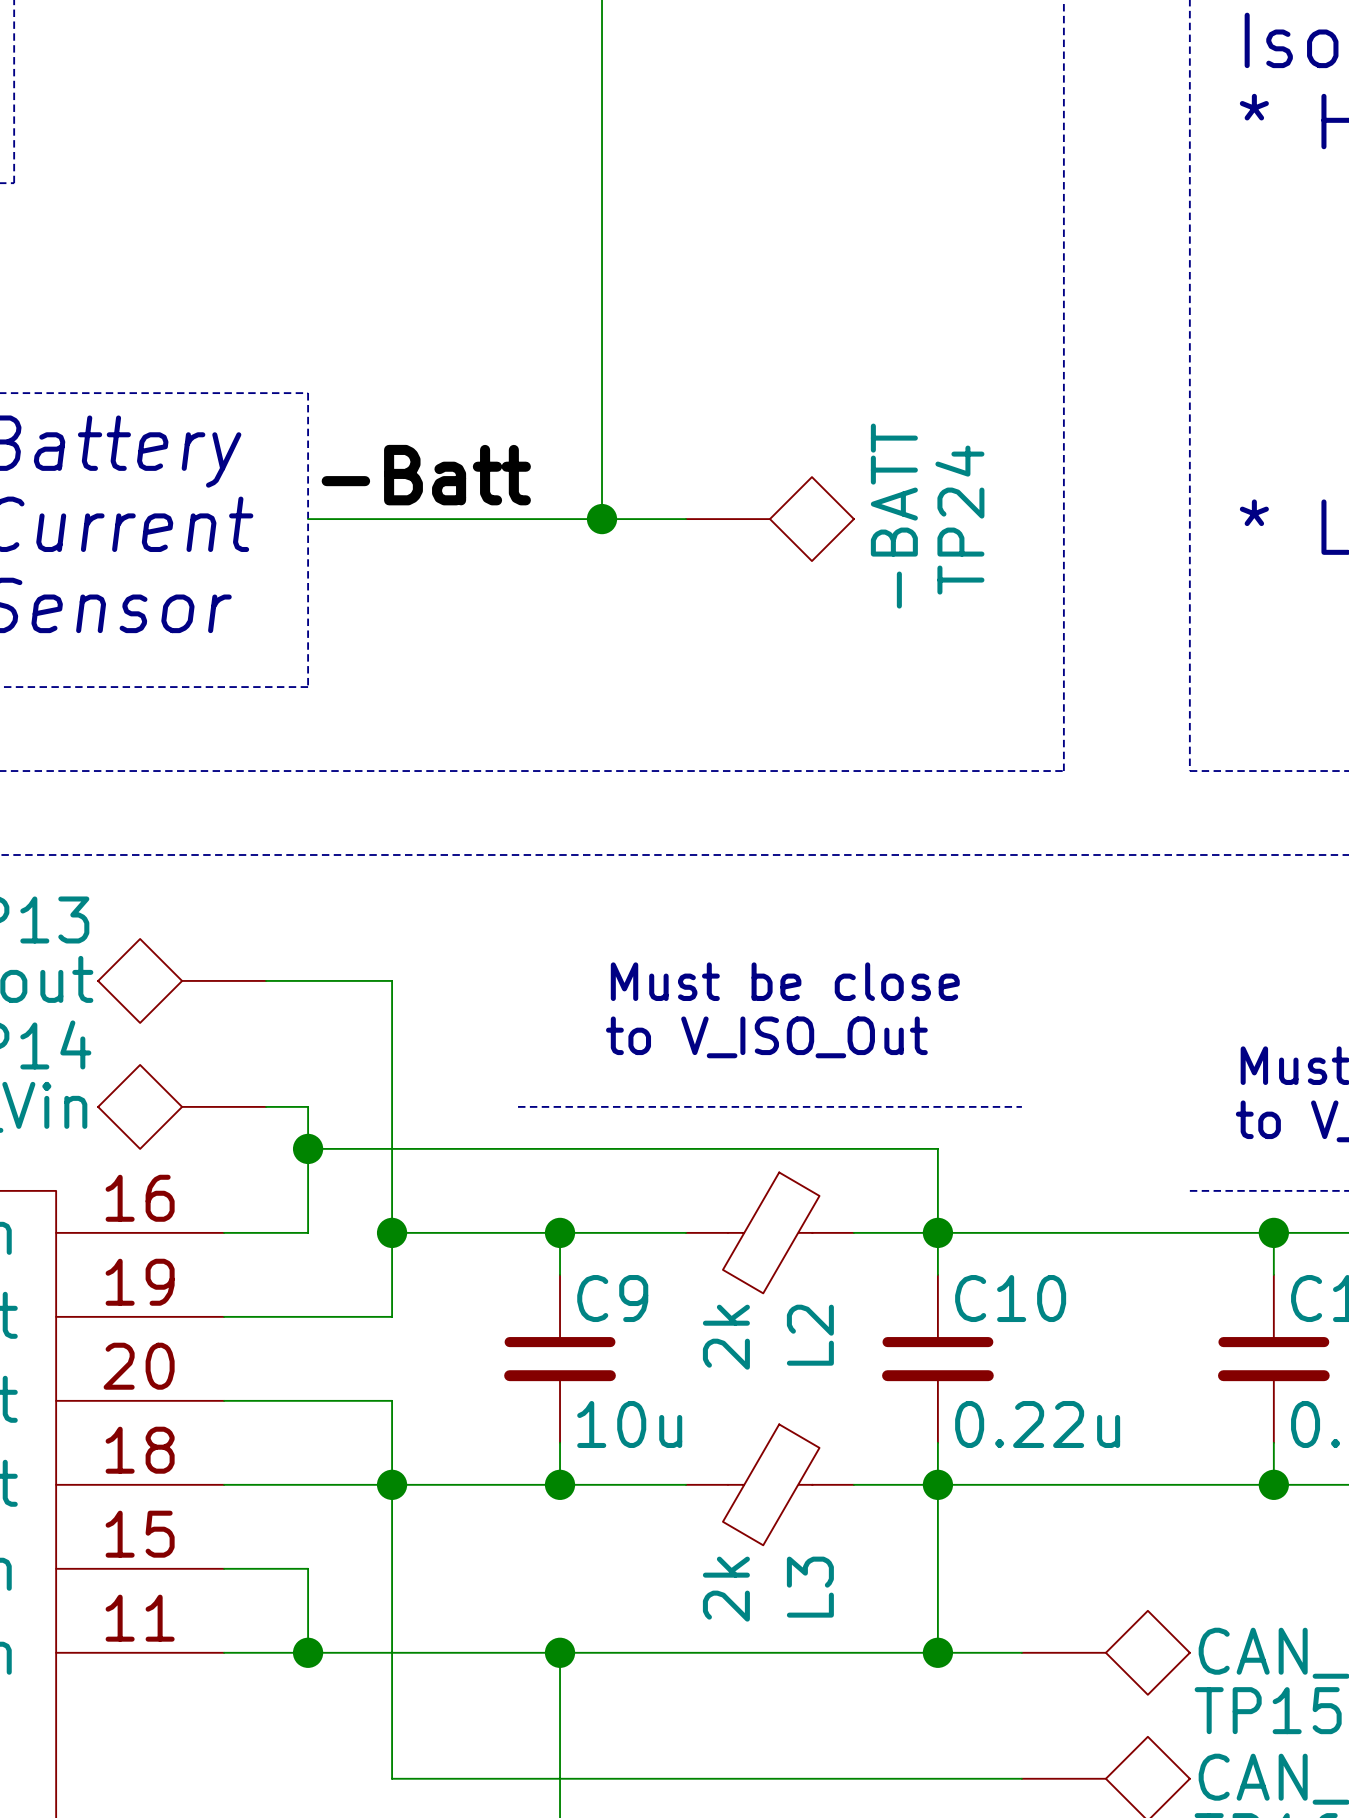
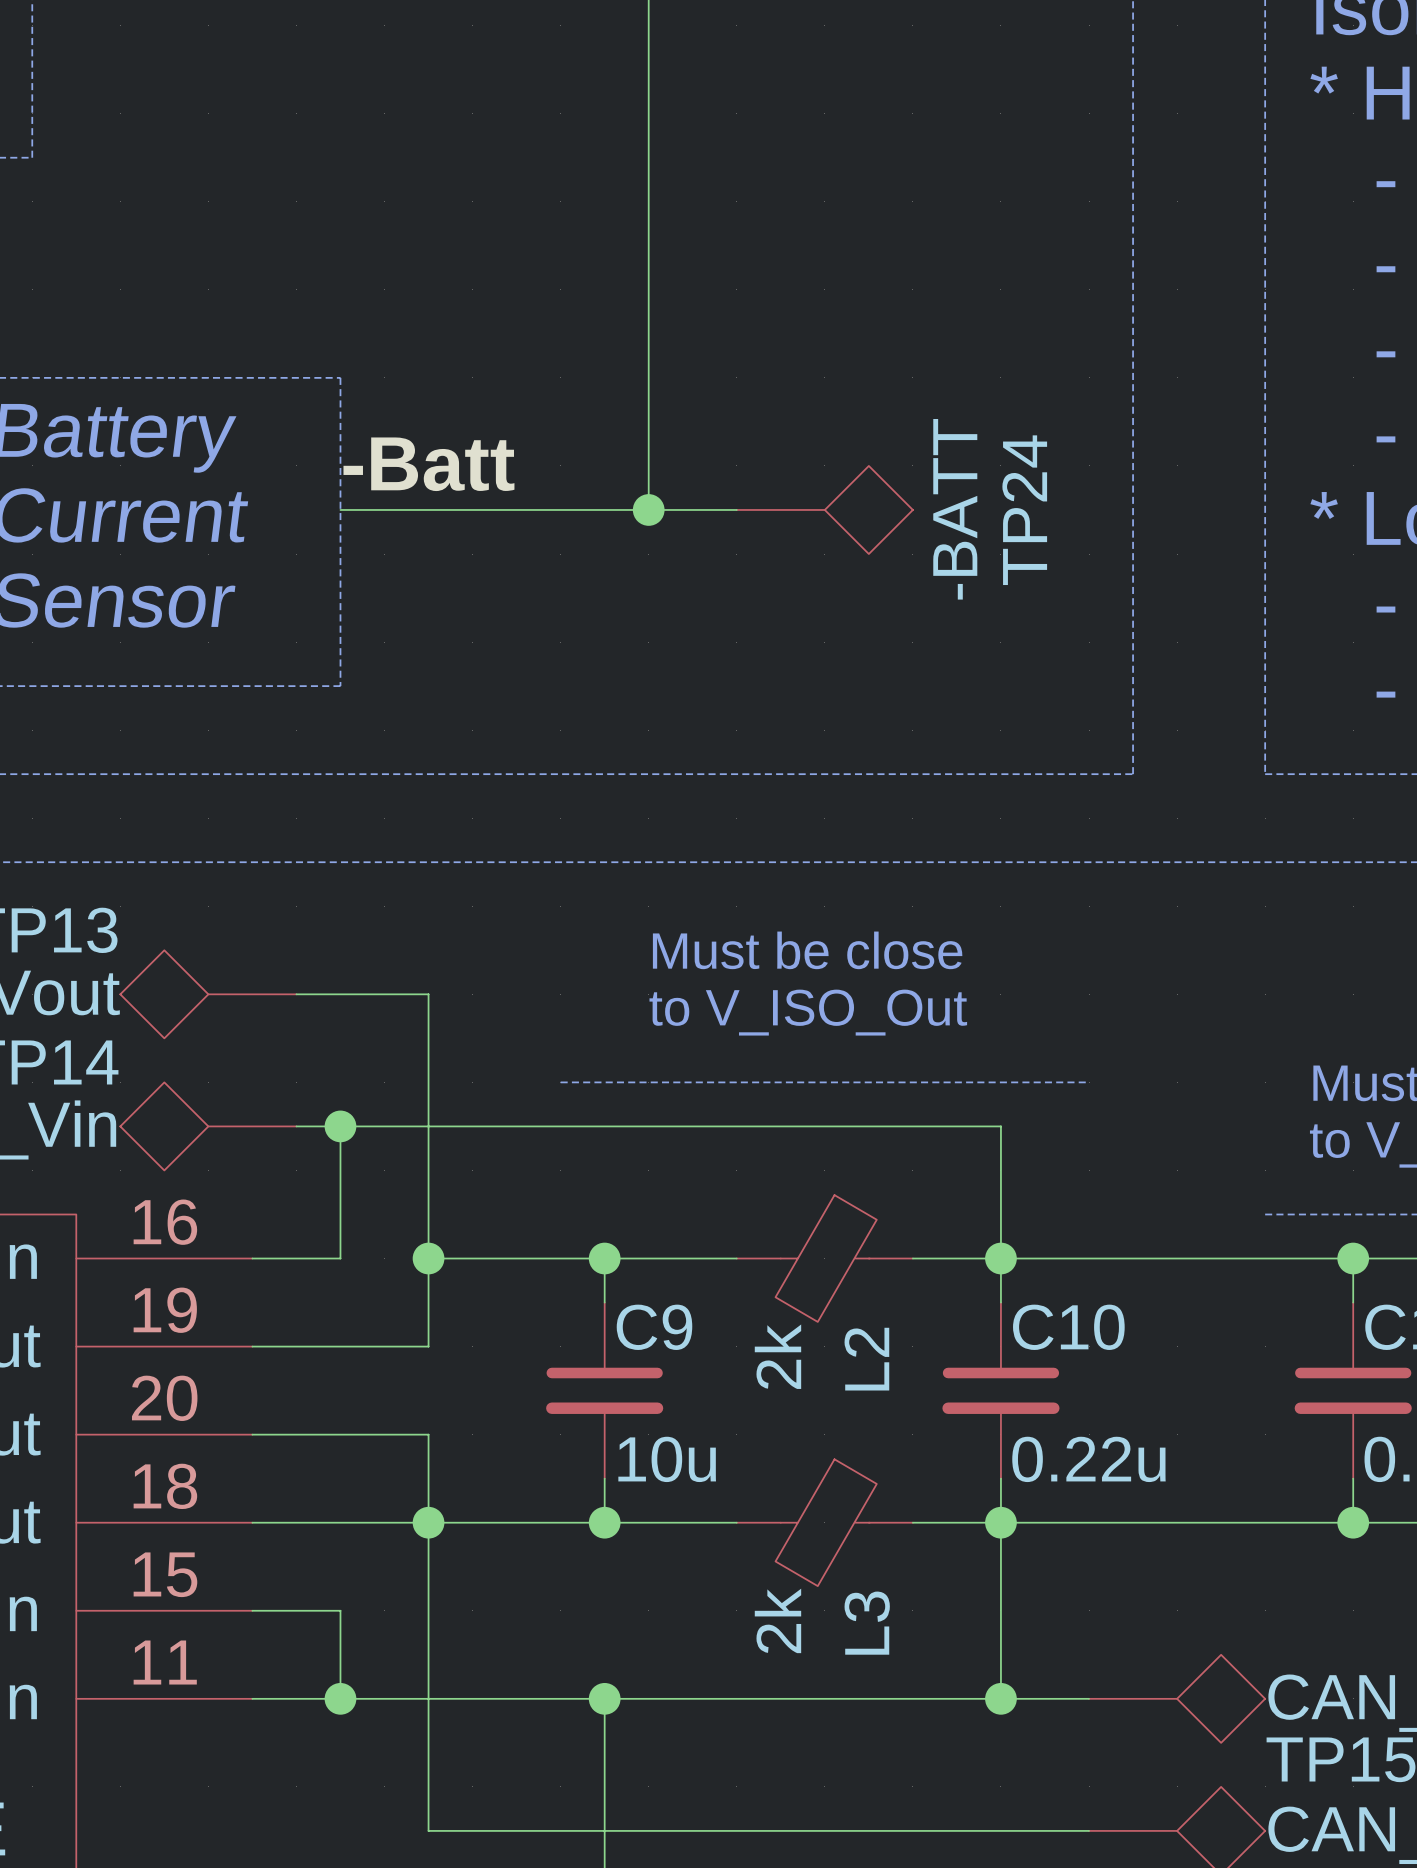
text: none -> Must be close (807, 950)
text: Must be close (785, 981) -> to V_ISO_Out (808, 1012)
text: to V_ISO_Out (766, 1037) -> none
line: (518, 1106) (1021, 1106) -> (560, 1082) (1089, 1082)
wire: (308, 1148) (937, 1148) -> (340, 1126) (1000, 1126) (1000, 1170)
junction position: (308, 1148) -> (340, 1126)

